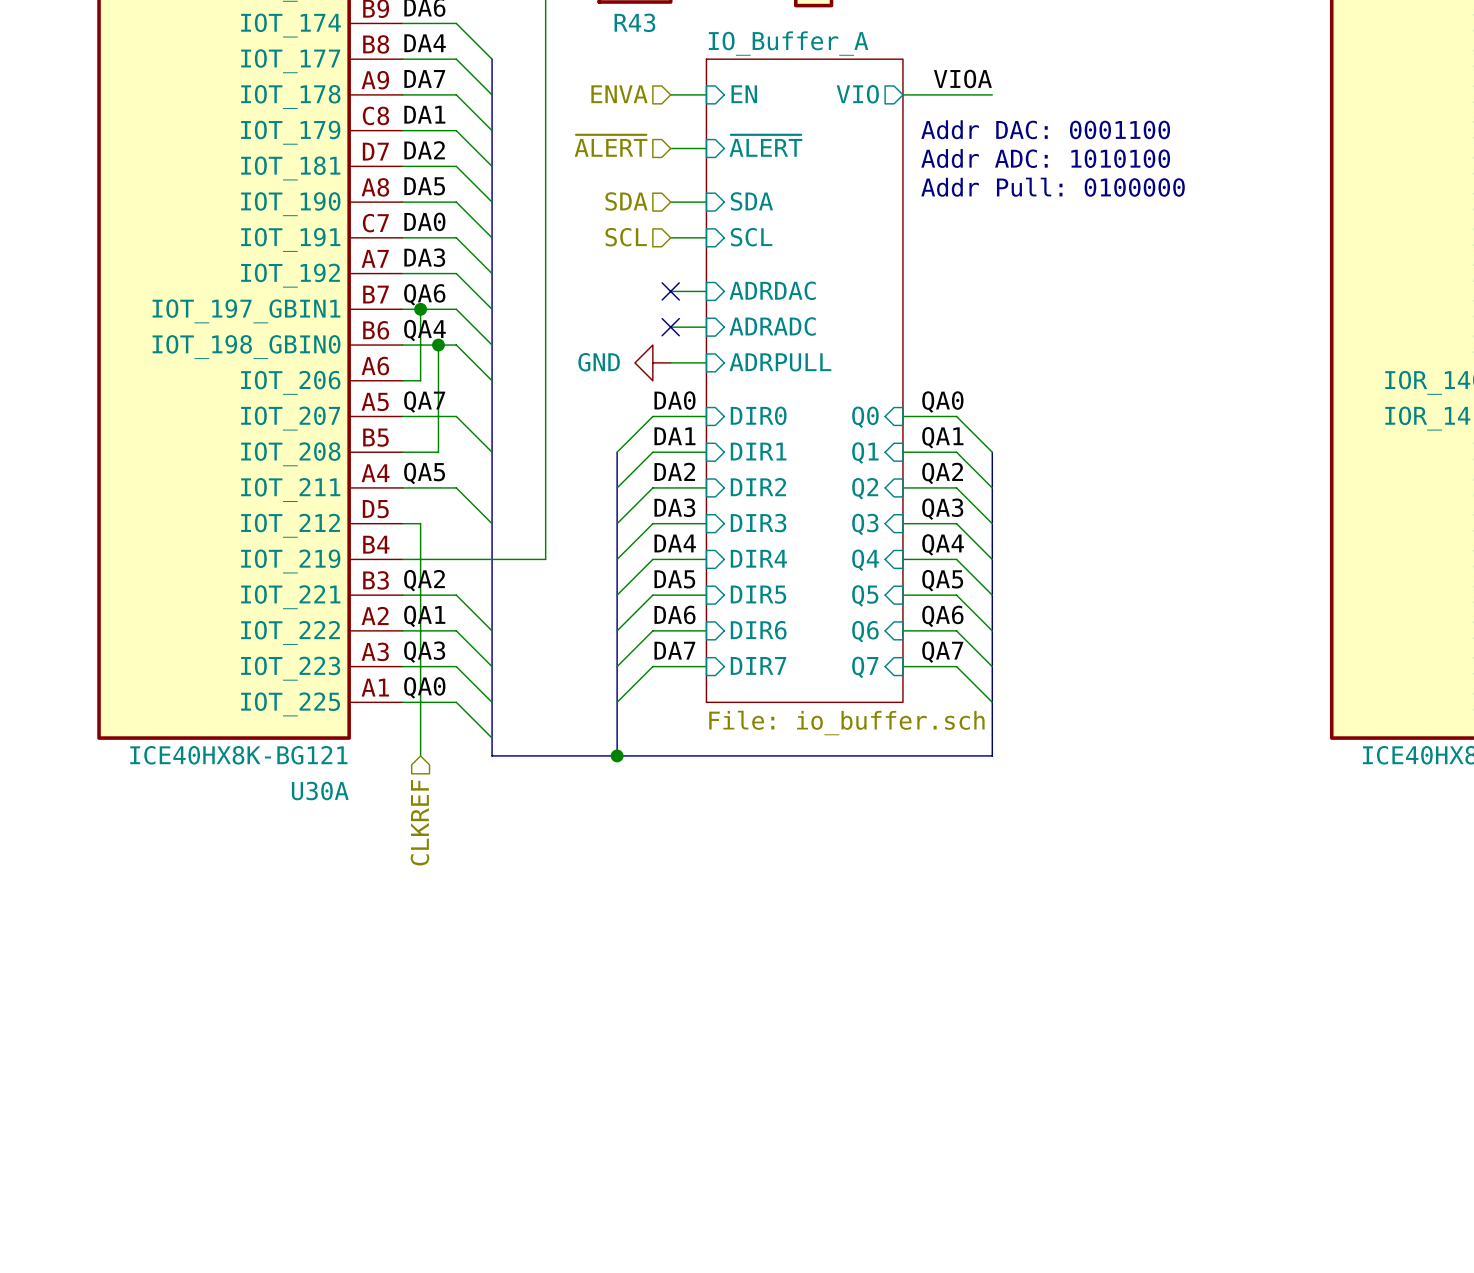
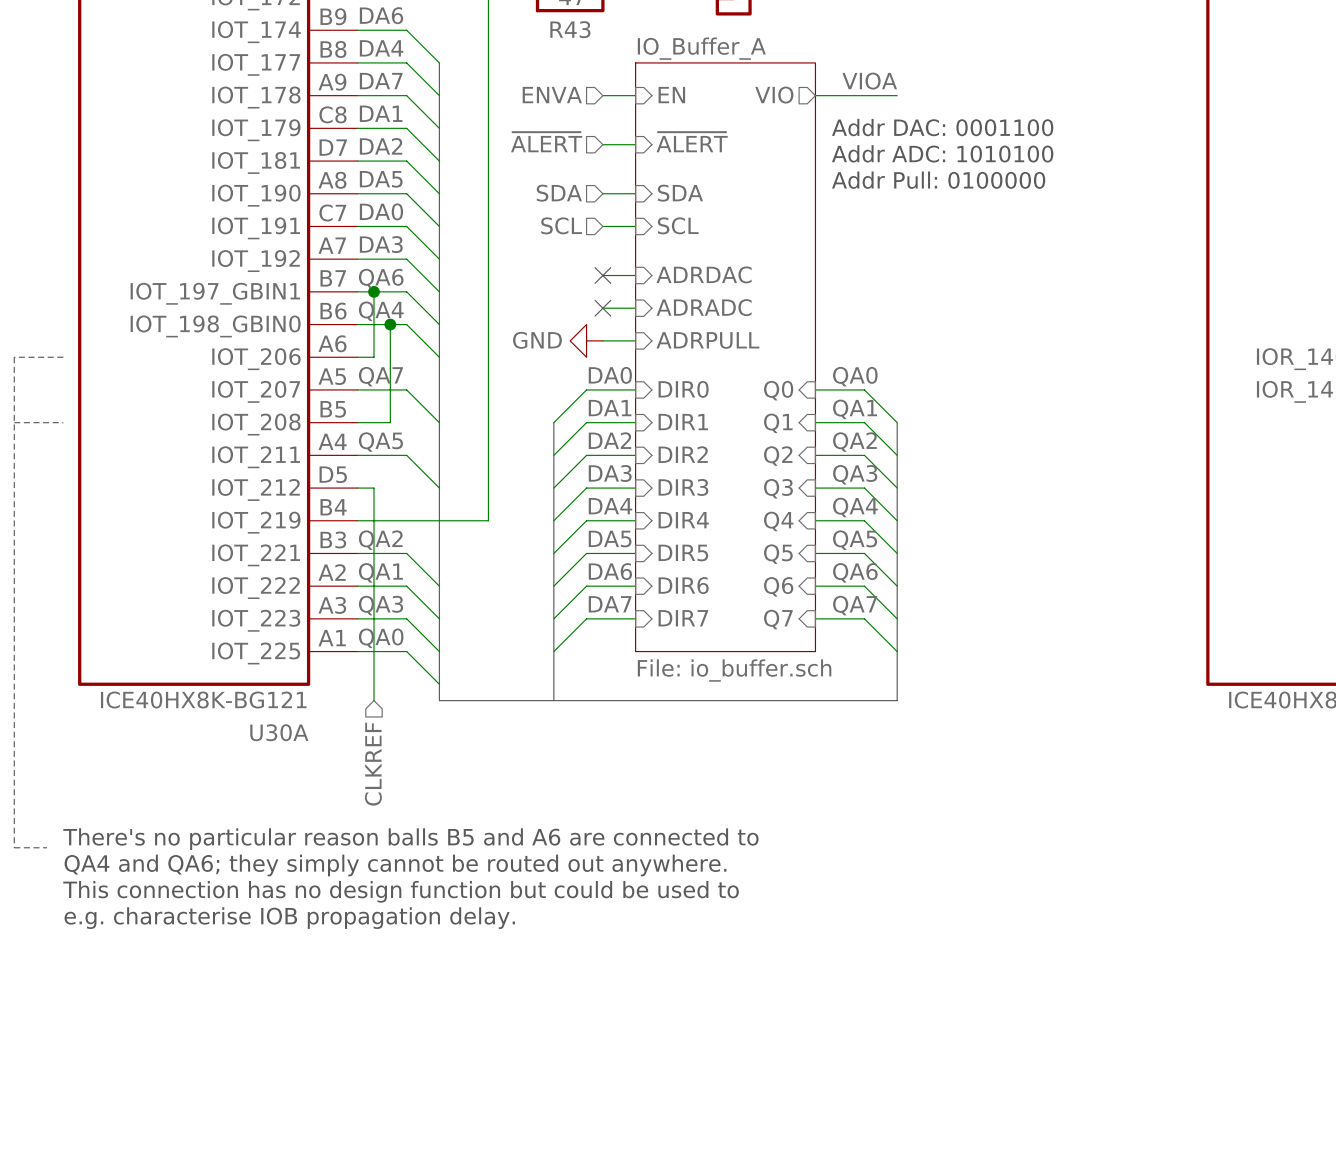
line: none -> (63, 357) (14, 357) (14, 847) (46, 847)
line: none -> (14, 422) (63, 422)
junction: (617, 755) -> none
text: none -> There's no particular reason balls B5 and A6 are connected to (410, 839)
text: none -> QA4 and QA6; they simply cannot be routed out anywhere. (395, 865)
text: none -> This connection has no design function but could be used to (401, 891)
text: none -> e.g. characterise IOB propagation delay. (289, 918)

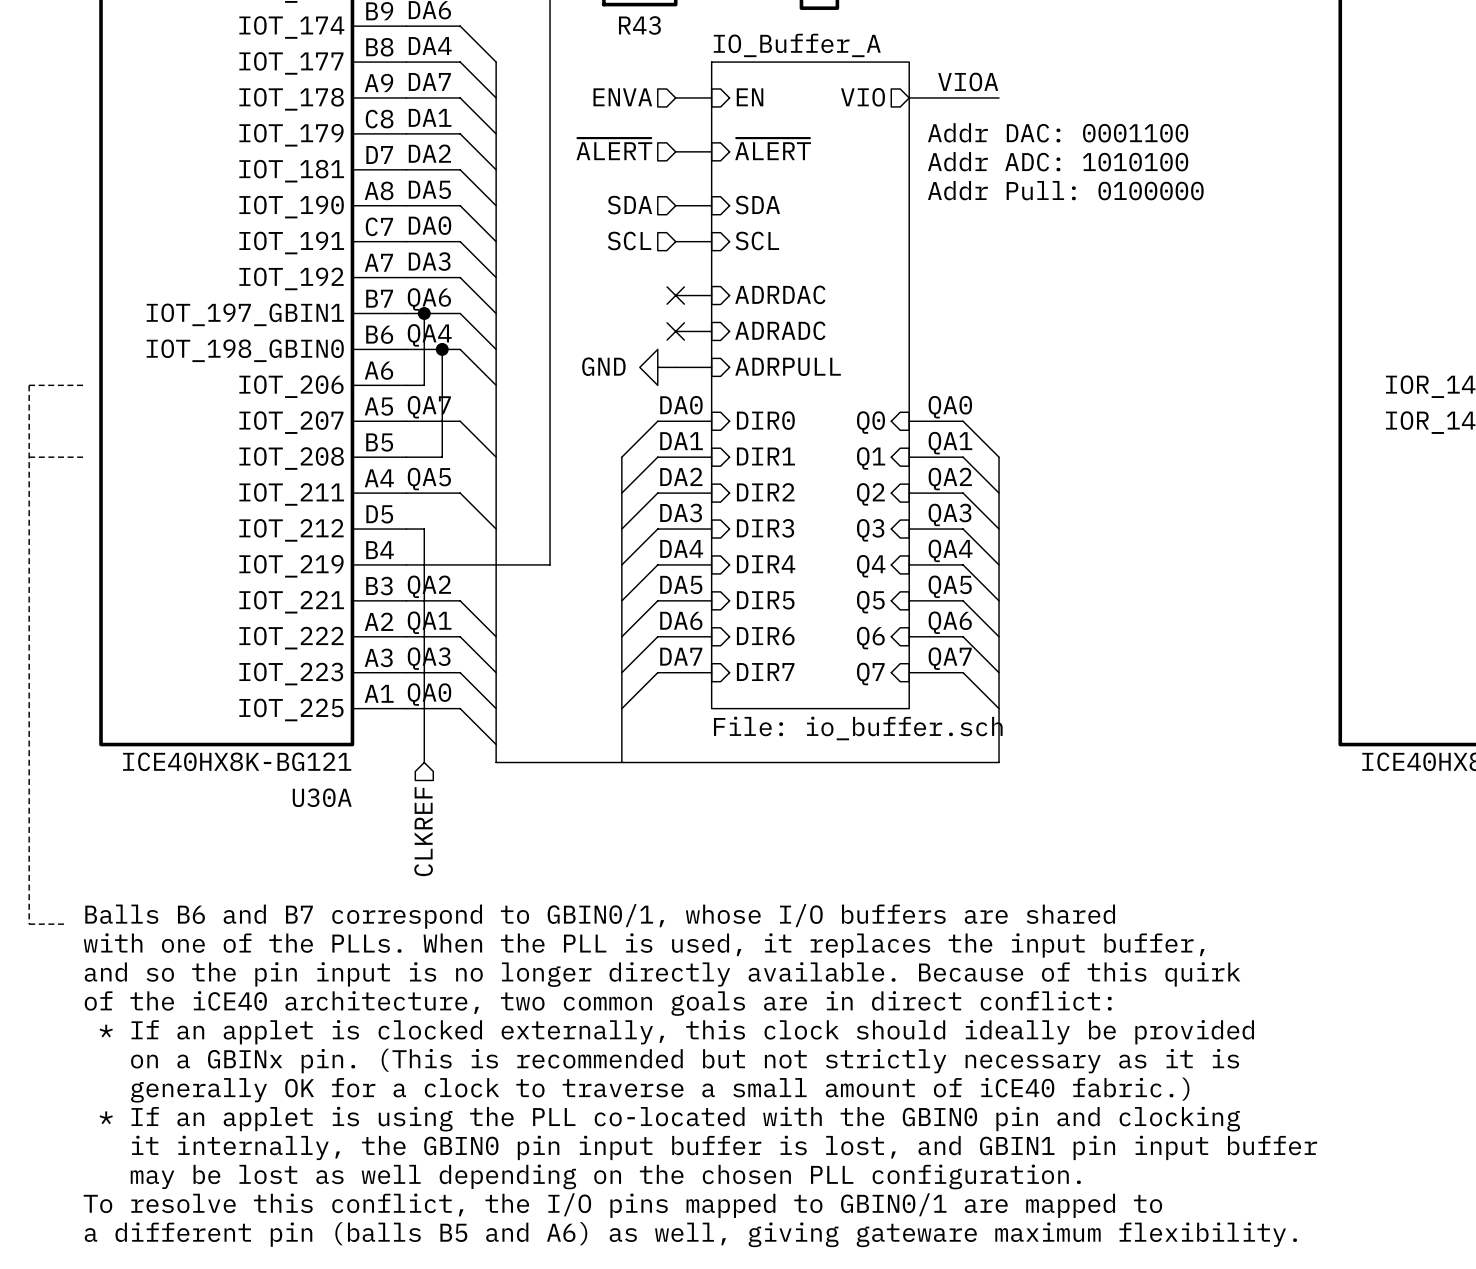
text: There's no particular reason balls B5 and A6 are connected to (410, 839) -> Balls B6 and B7 correspond to GBIN0/1, whose I/O buffers are shared (600, 916)
text: QA4 and QA6; they simply cannot be routed out anywhere. (395, 865) -> with one of the PLLs. When the PLL is used, it replaces the input buffer, (644, 945)
text: This connection has no design function but could be used to (401, 891) -> and so the pin input is no longer directly available. Because of this quirk (662, 974)
text: e.g. characterise IOB propagation delay. (289, 918) -> of the iCE40 architecture, two common goals are in direct conflict: (598, 1003)
text: none -> * If an applet is clocked externally, this clock should ideally be provided (676, 1032)
text: none -> on a GBINx pin. (This is recommended but not strictly necessary as it is (685, 1060)
text: none -> generally OK for a clock to traverse a small amount of iCE40 fabric.) (660, 1090)
text: none -> * If an applet is using the PLL co-located with the GBIN0 pin and clocking (669, 1119)
text: none -> it internally, the GBIN0 pin input buffer is lost, and GBIN1 pin input buffer (724, 1147)
text: none -> may be lost as well depending on the chosen PLL configuration. (605, 1176)
text: none -> To resolve this conflict, the I/O pins mapped to GBIN0/1 are mapped to (622, 1205)
text: none -> a different pin (balls B5 and A6) as well, giving gateware maximum flexibility. (690, 1234)

